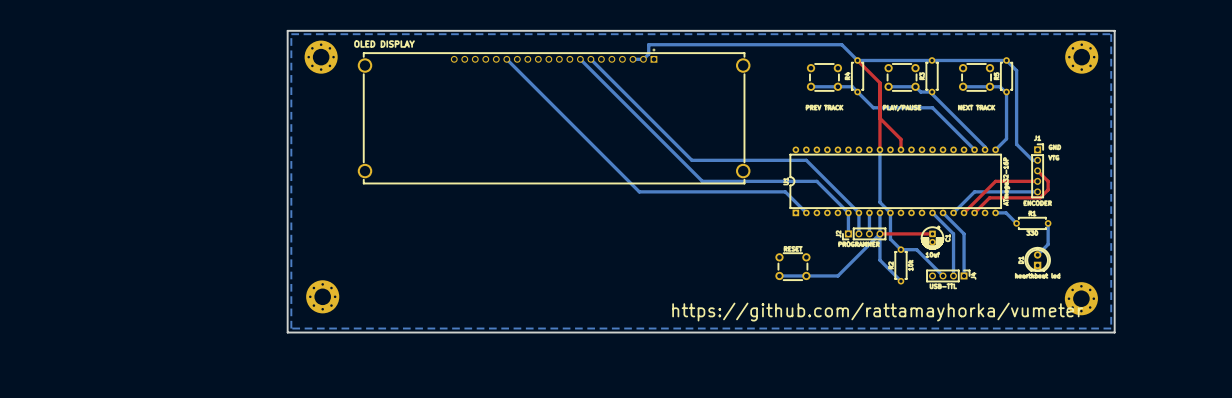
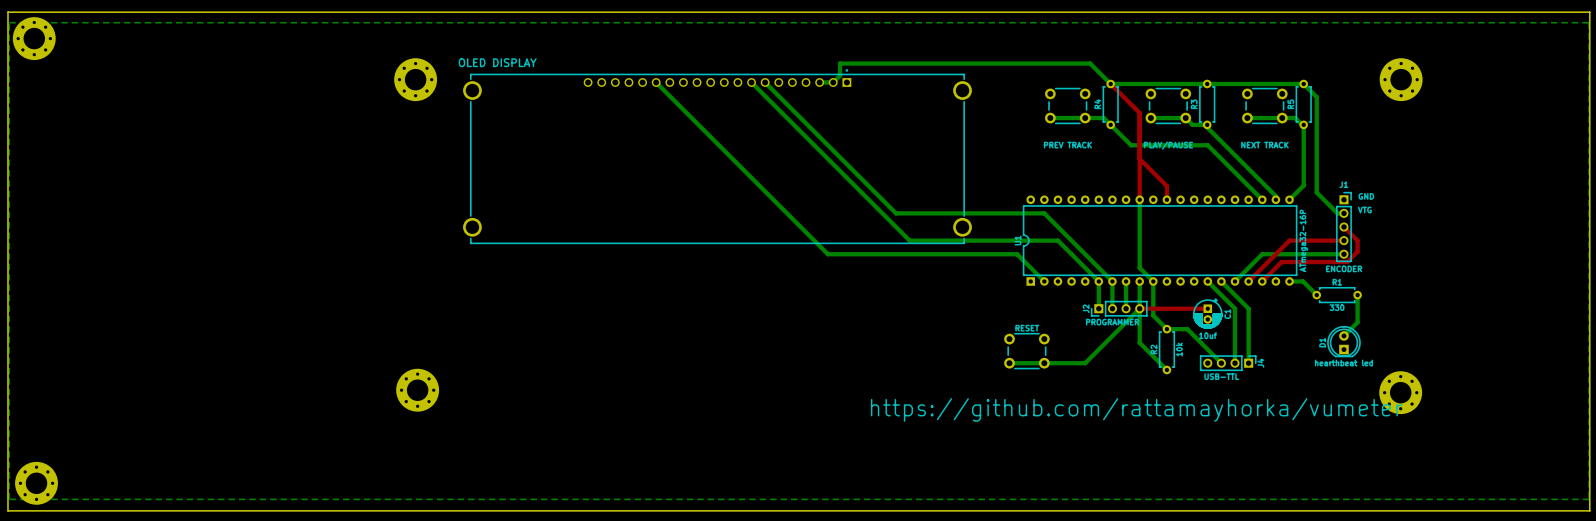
part: none -> (34, 38)
board edge: (287, 30) (1114, 30) (1114, 332) (287, 332) (287, 30) -> (7, 12) (7, 510) (1589, 510) (1589, 12) (7, 12)
bottom zone outline: (291, 34) (1111, 34) (1111, 328) (291, 328) (291, 34) -> (9, 22) (9, 499) (1589, 499) (1589, 22) (9, 22)
part: none -> (36, 483)

